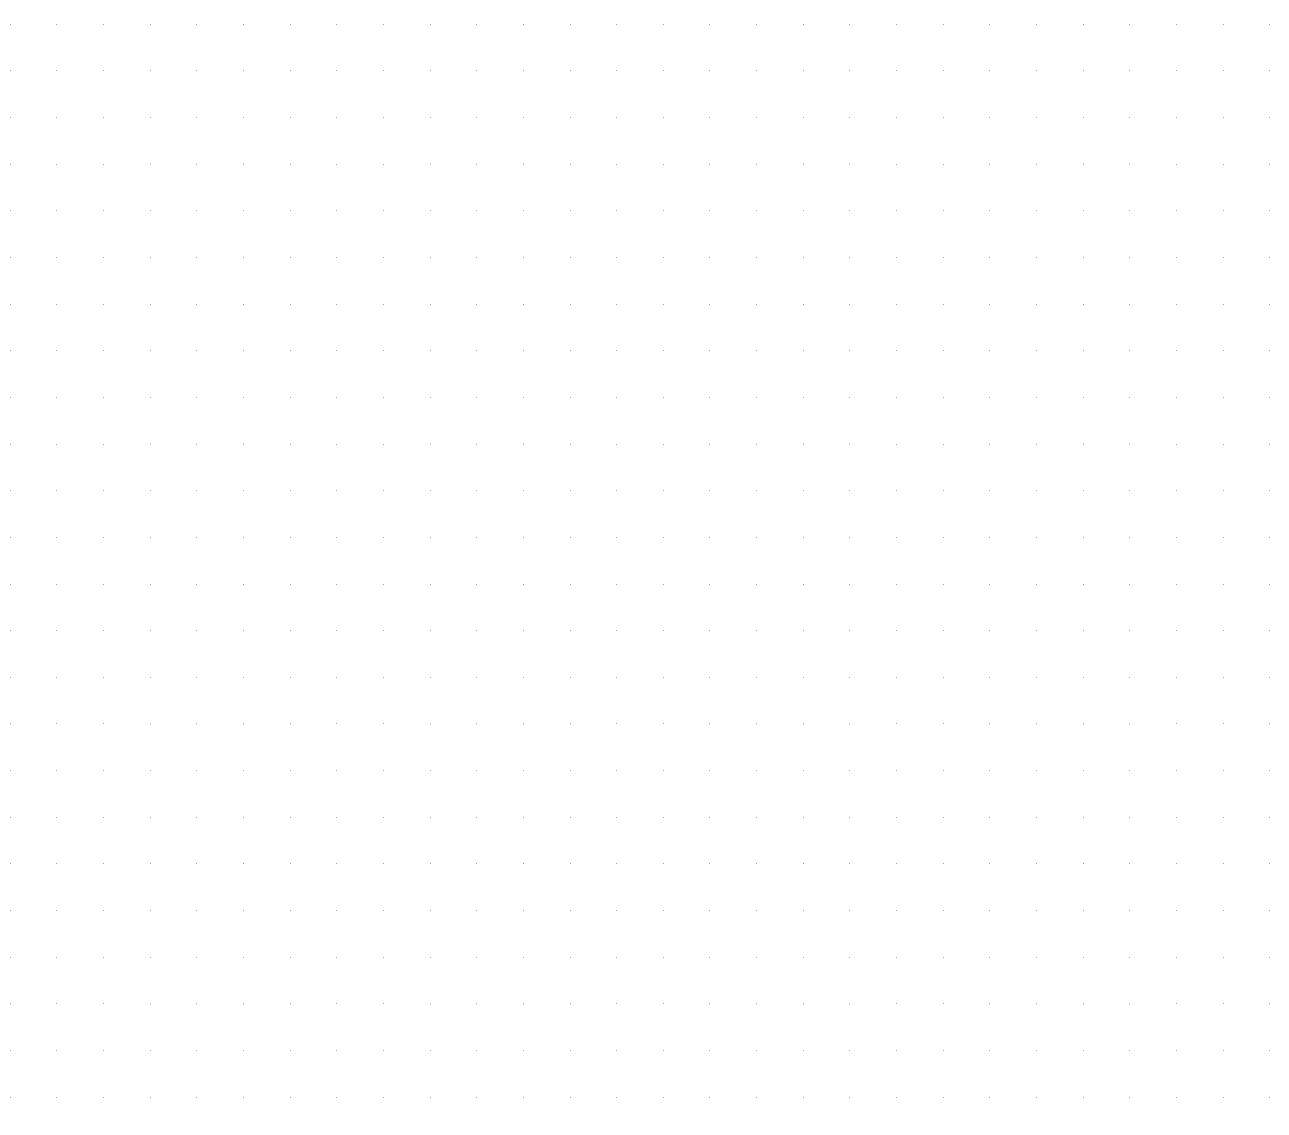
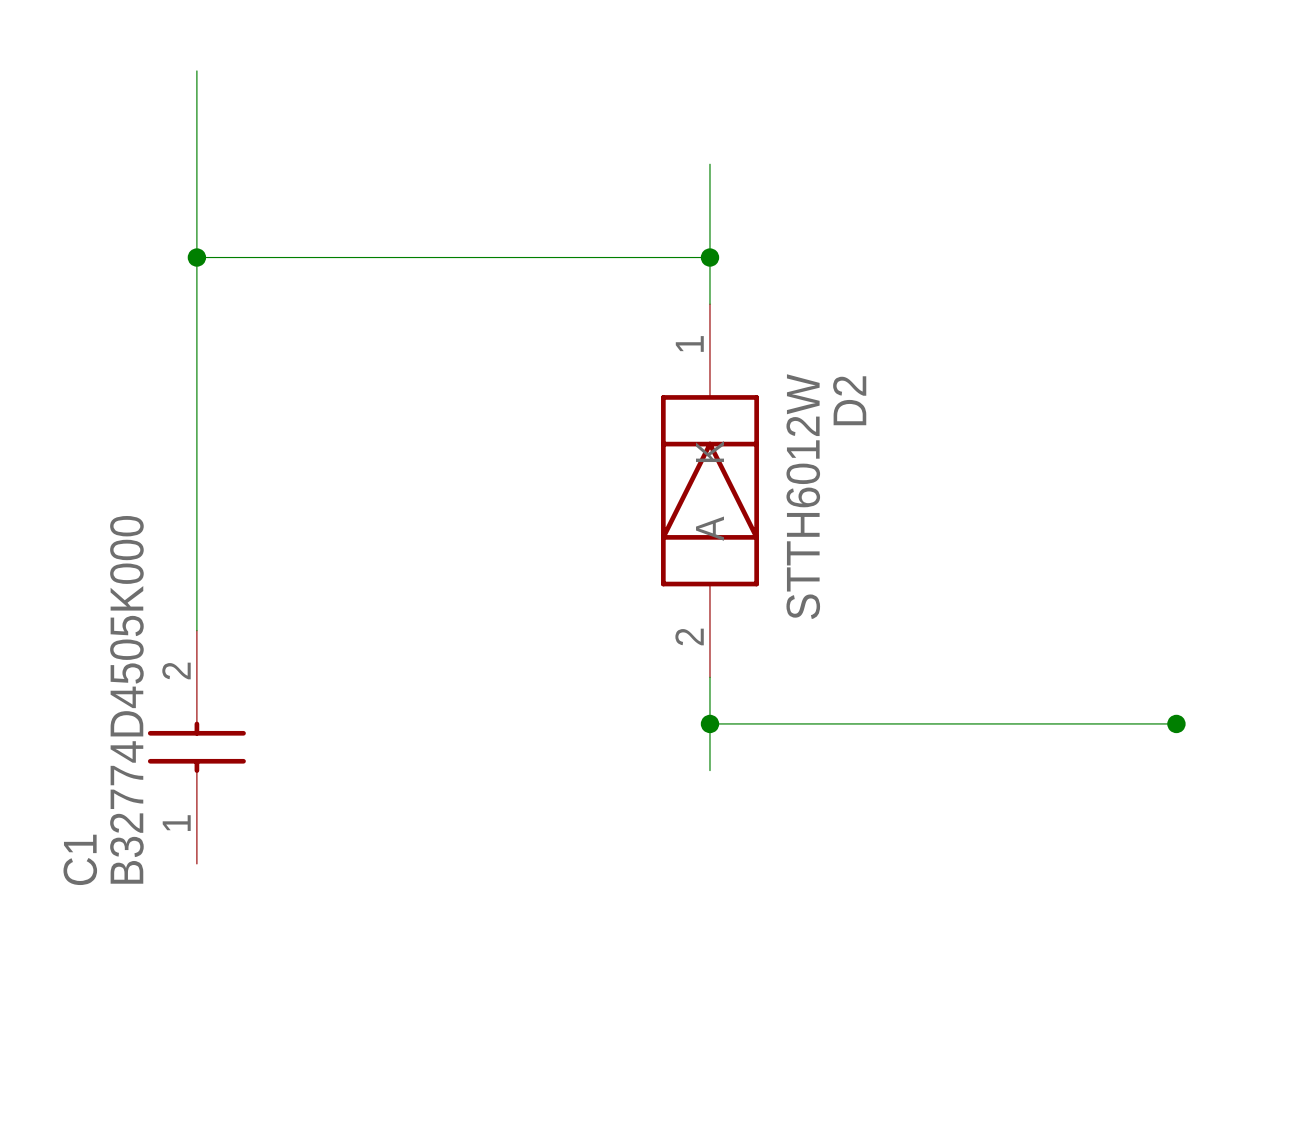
wire: none -> (196, 70) (196, 630)
wire: none -> (709, 164) (709, 304)
wire: none -> (196, 257) (709, 257)
junction: none -> (196, 257)
junction: none -> (709, 257)
D2: none -> STTH6012W (709, 490)
wire: none -> (709, 677) (709, 770)
wire: none -> (709, 723) (1176, 723)
junction: none -> (709, 723)
junction: none -> (1176, 723)
C1: none -> B32774D4505K000 (196, 747)

